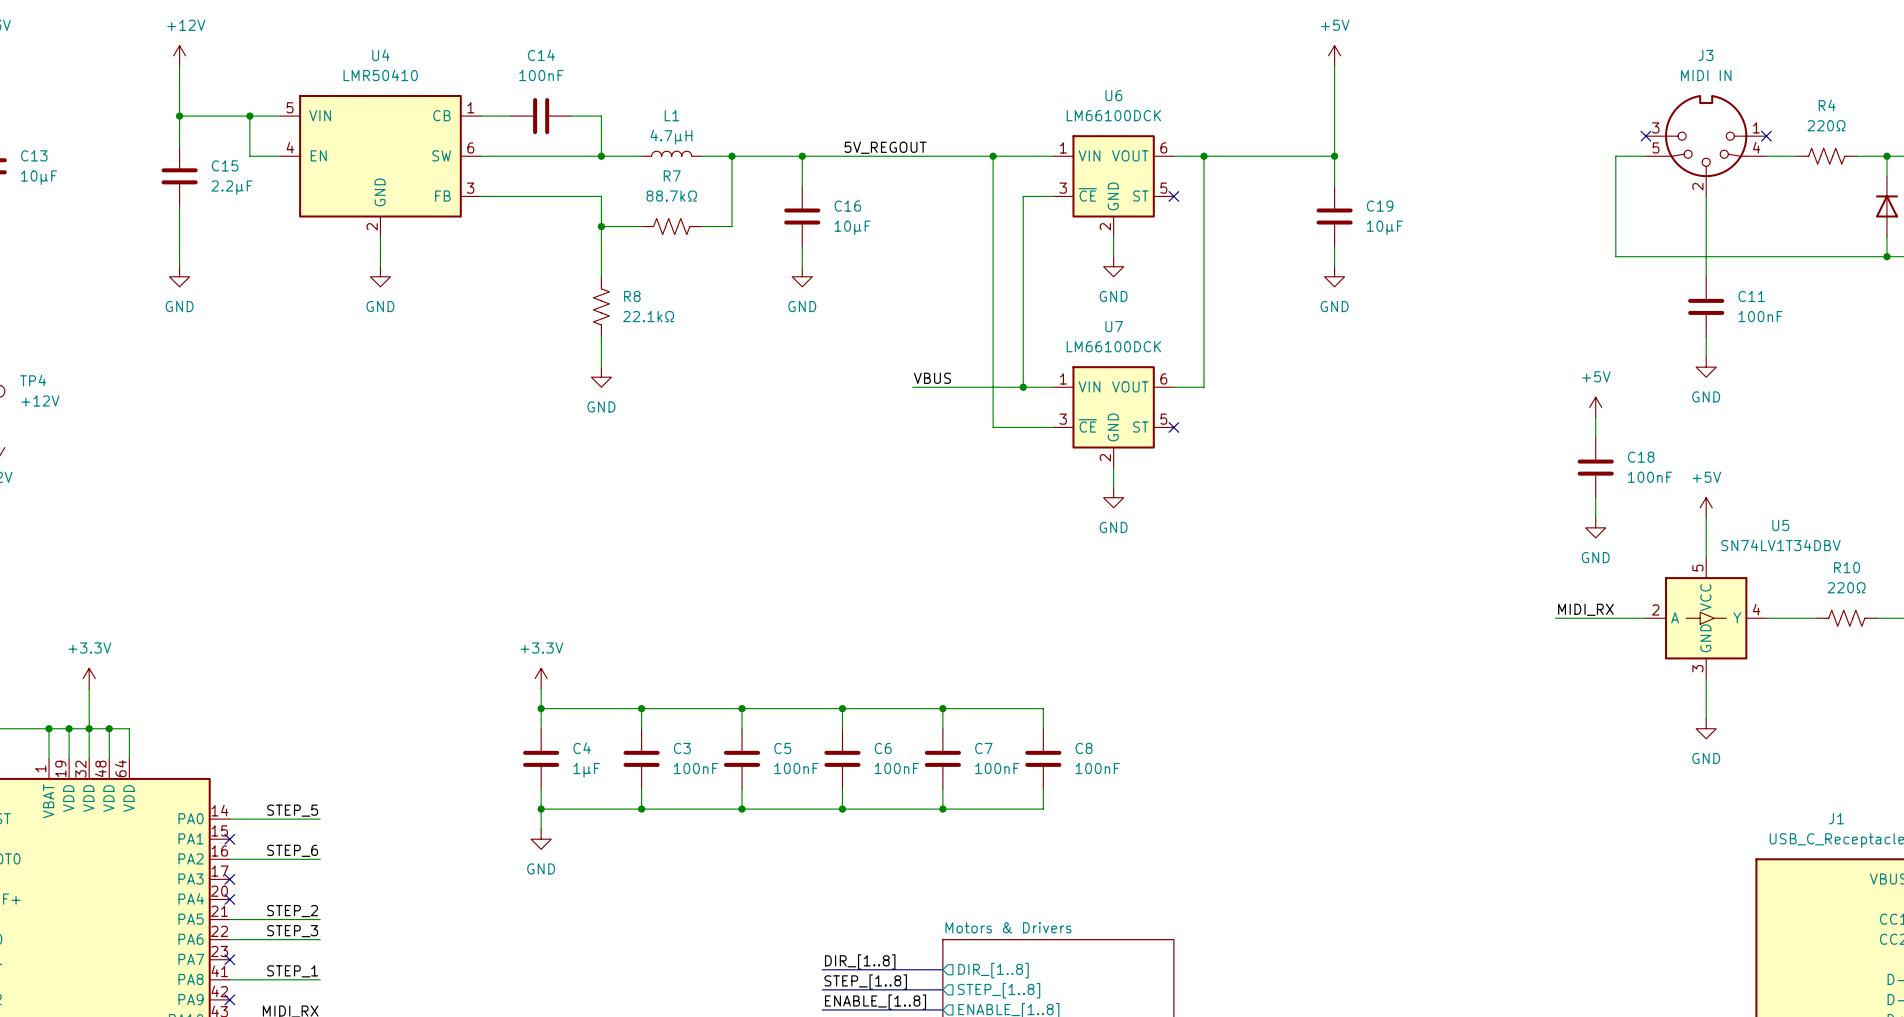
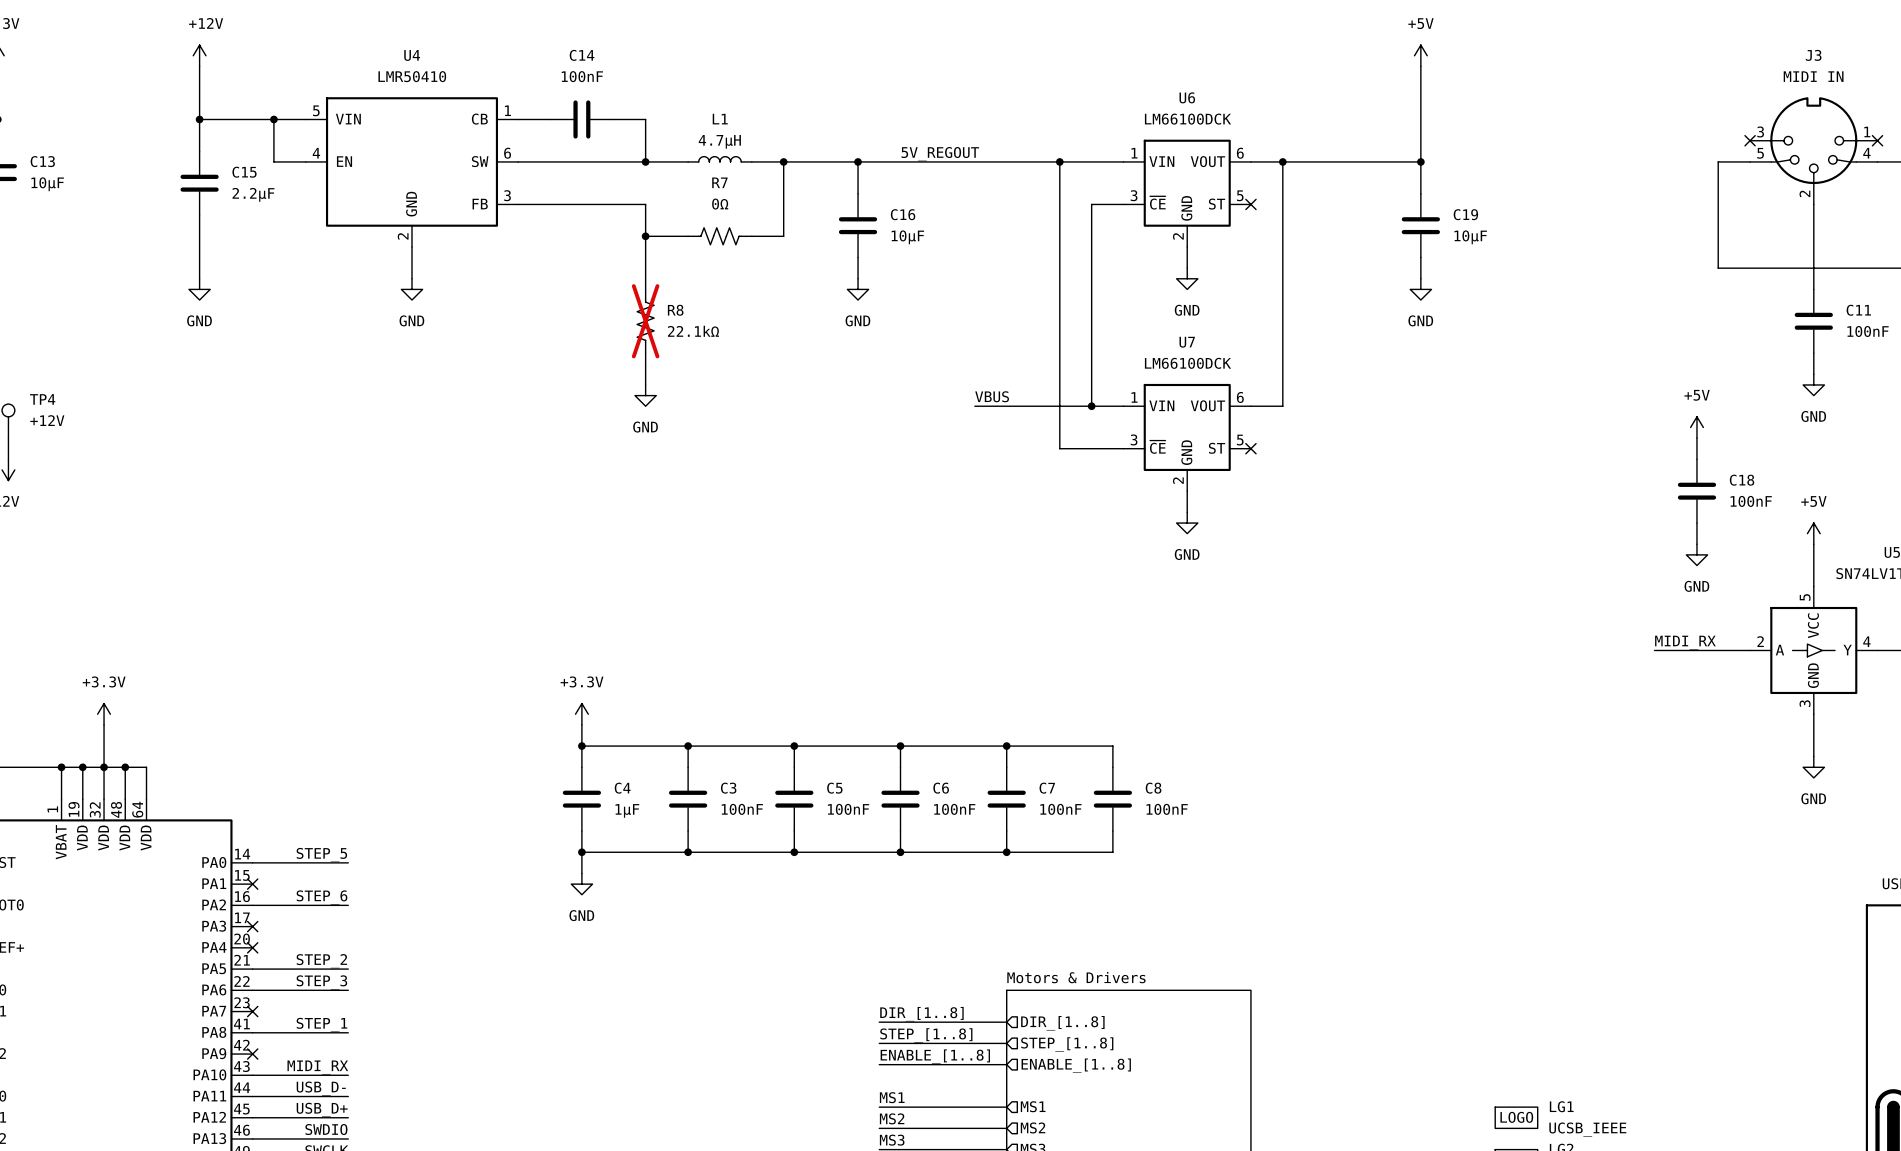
R7 value: 88.7kΩ (671, 196) -> 0Ω (720, 204)
R8 do-not-place cross: none -> (645, 321)

